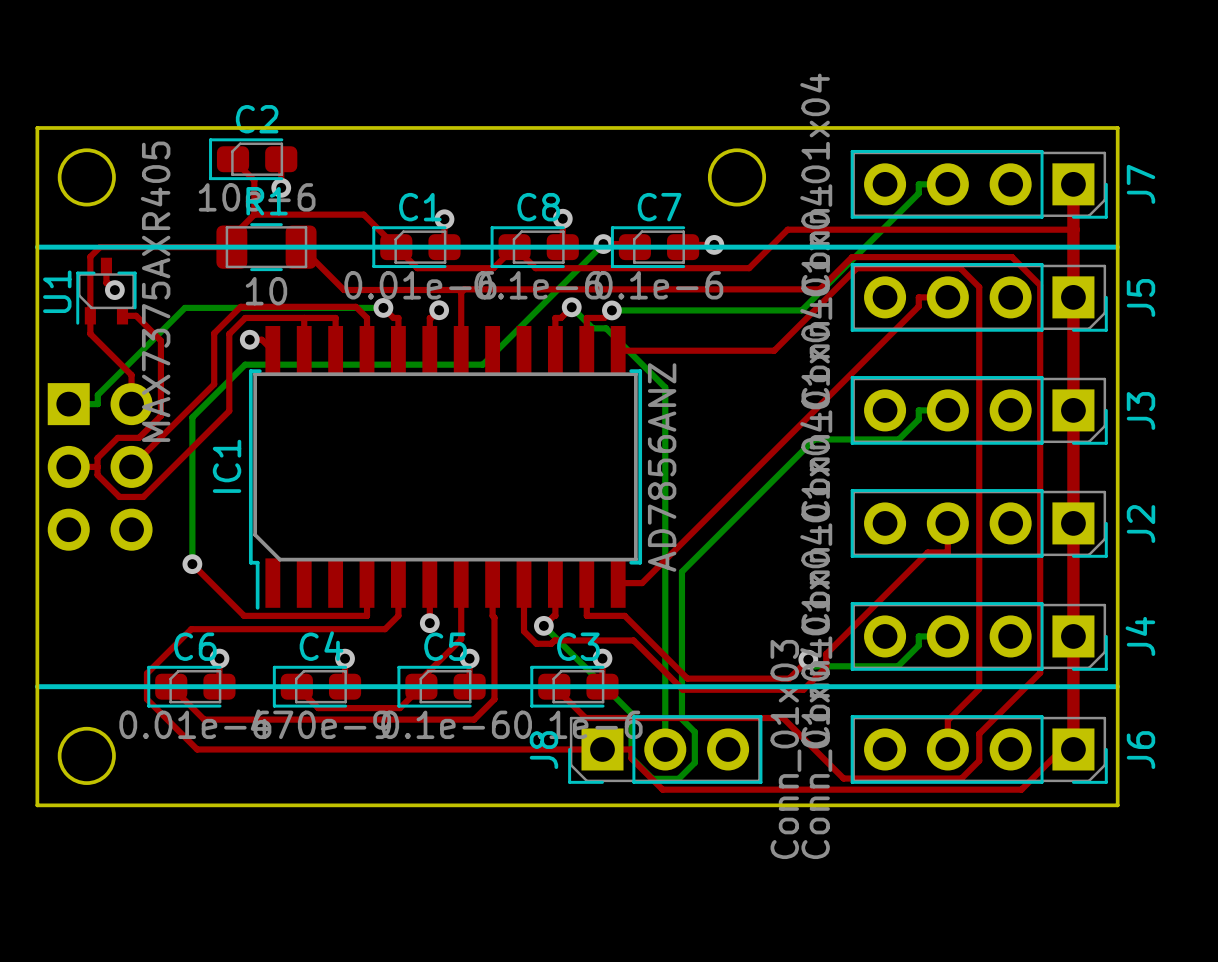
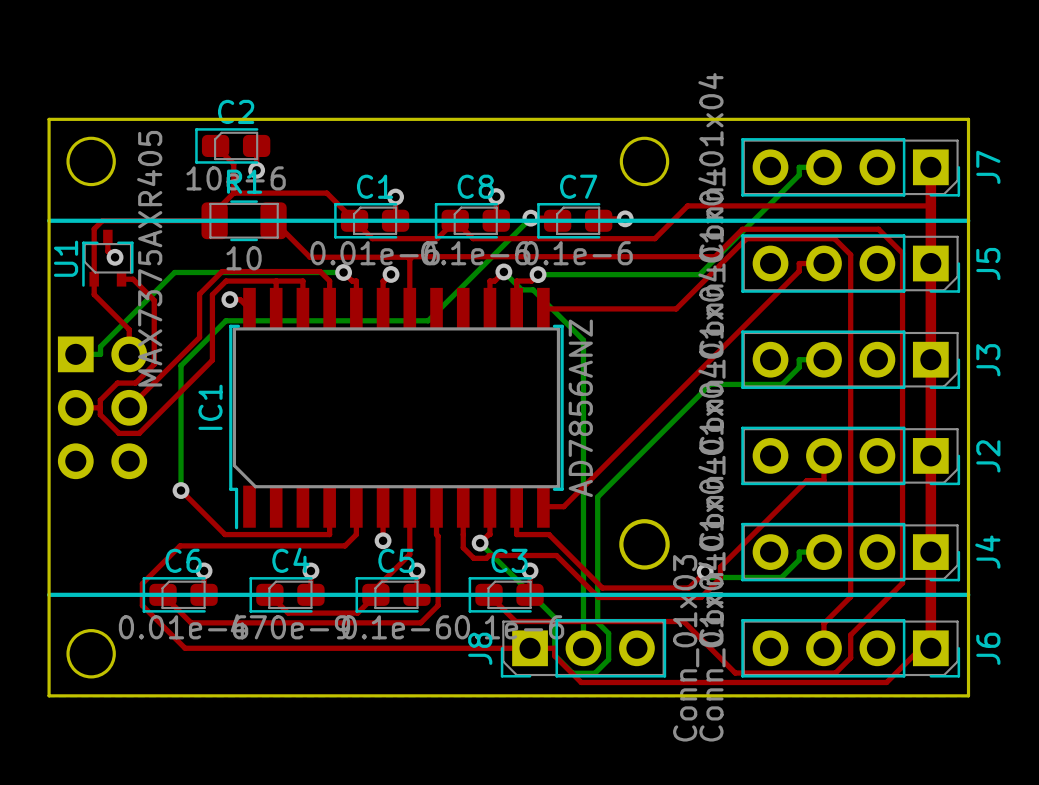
round board edge: none -> [619, 519, 670, 570]

